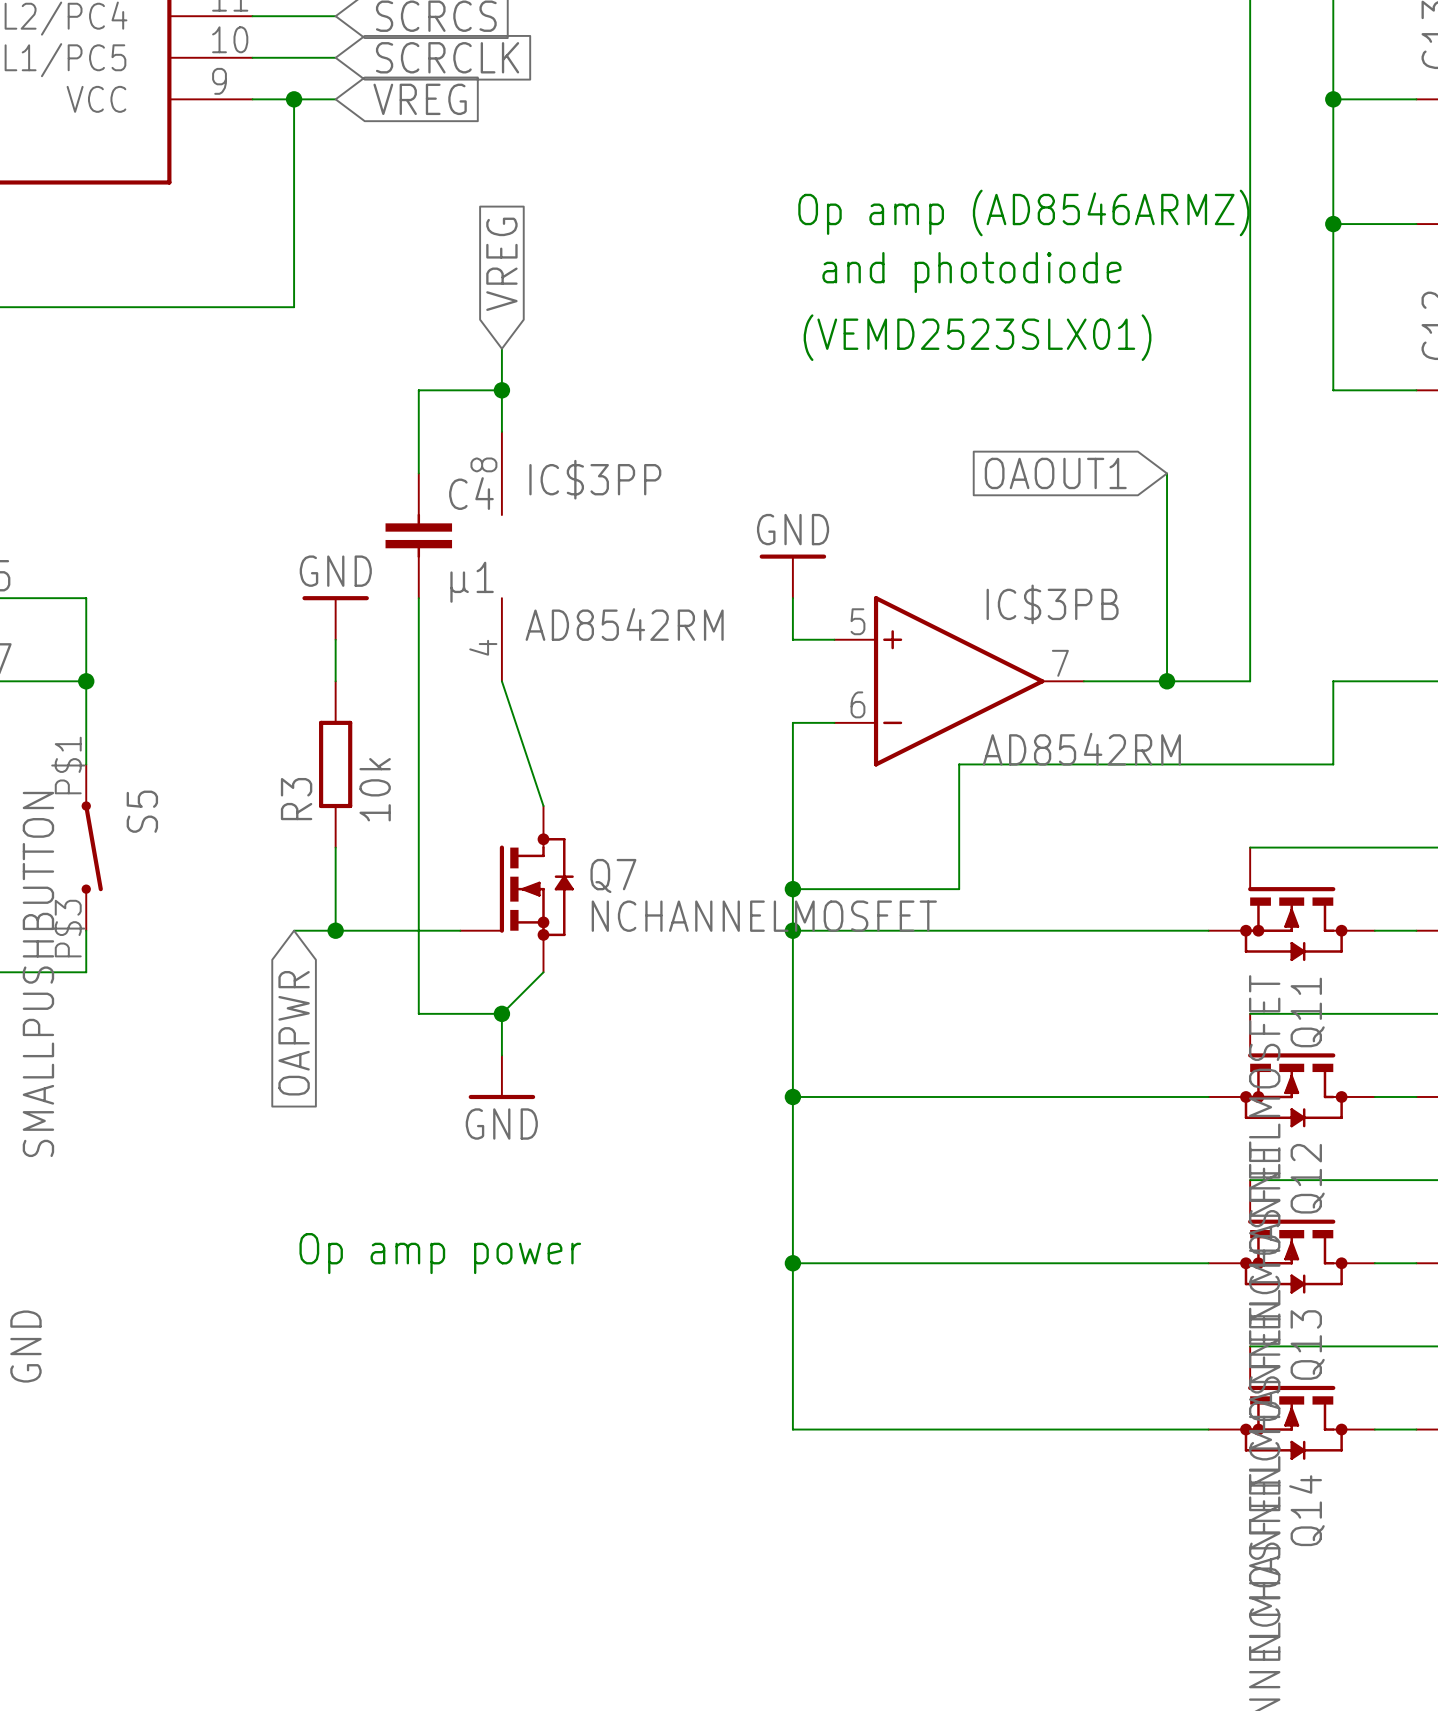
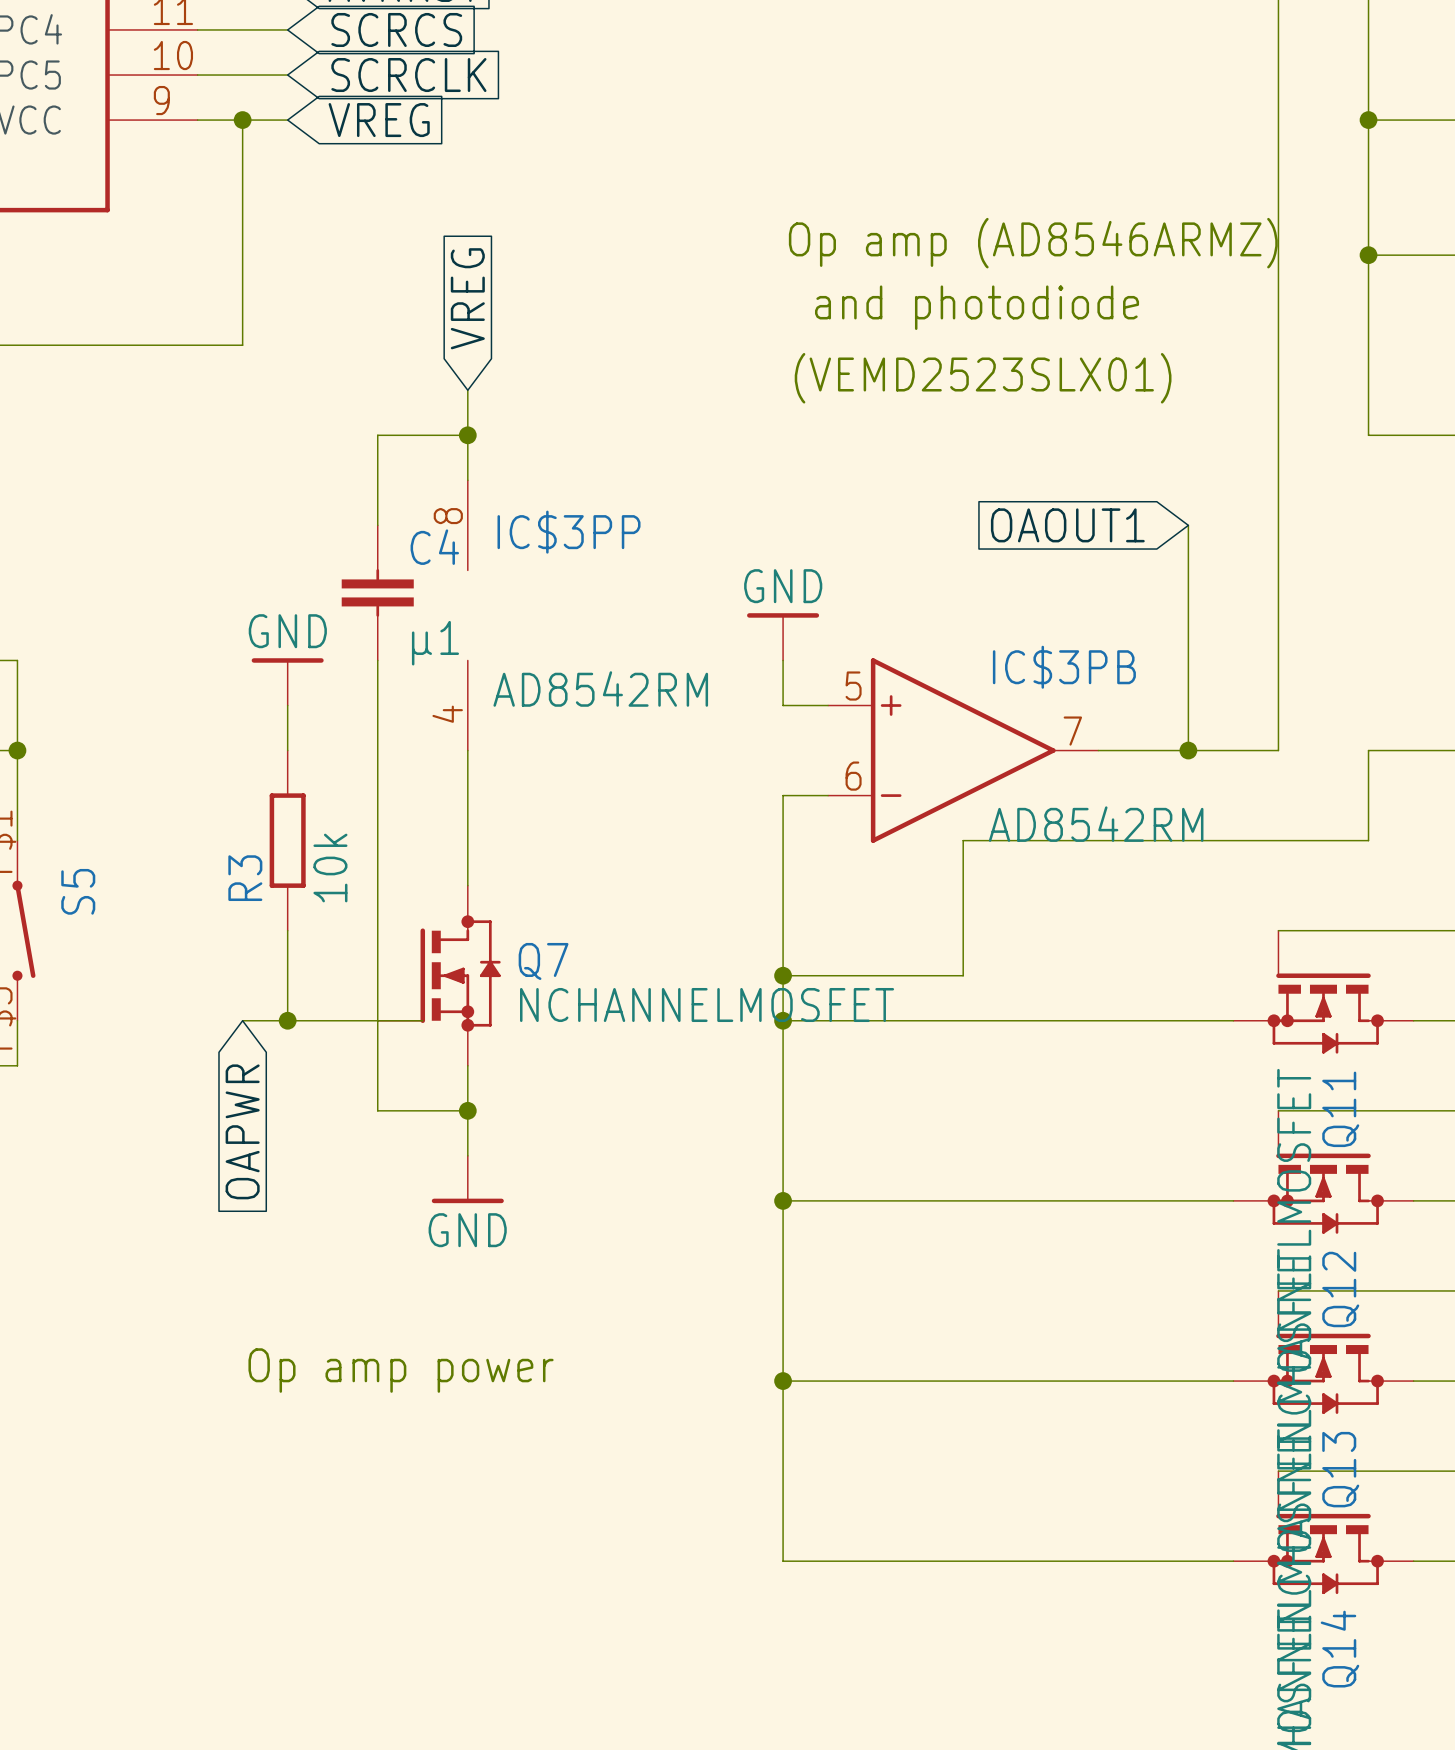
wire: (501, 681) (543, 806) -> (467, 750) (467, 885)
Q7 position: (517, 889) -> (439, 975)
wire: (543, 972) (501, 1013) -> (467, 1065) (467, 1110)

